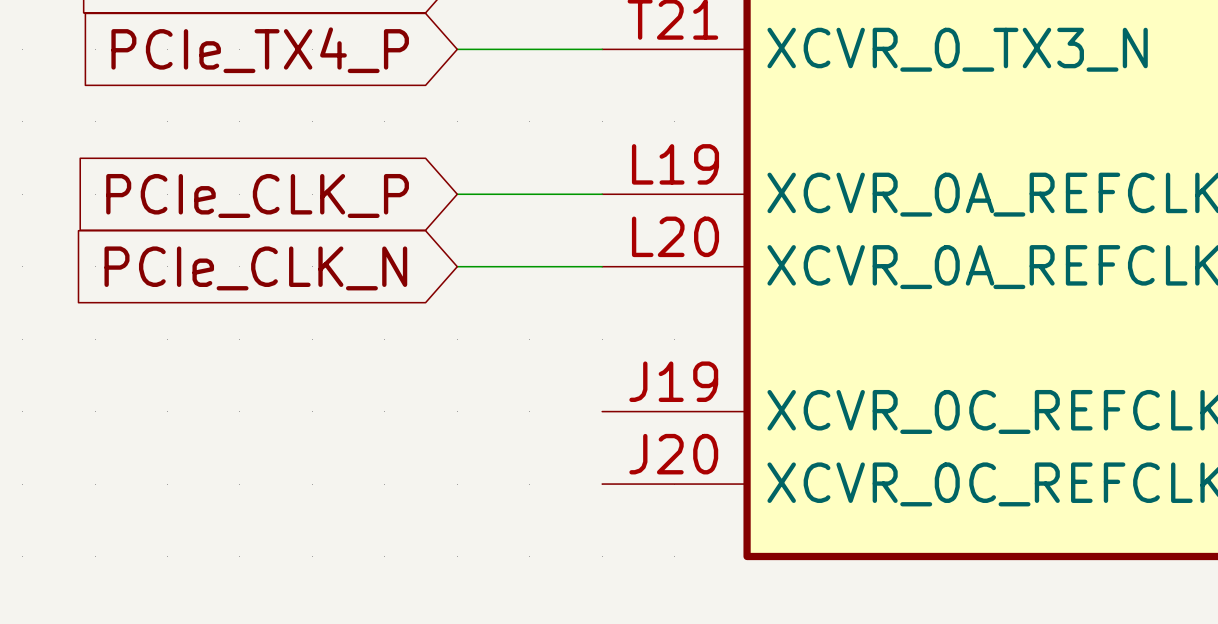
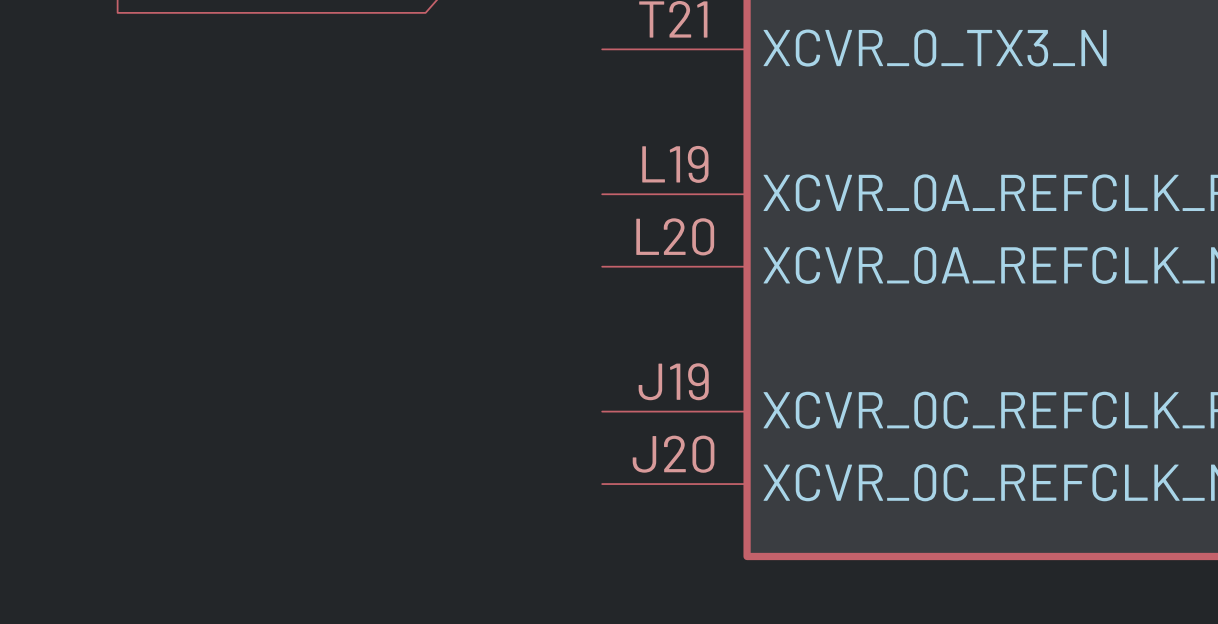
wire: (457, 49) (602, 49) -> none
global label: PCIe_TX4_P (260, 50) -> none
wire: (457, 194) (602, 194) -> none
global label: PCIe_CLK_P (257, 195) -> none
wire: (457, 266) (602, 266) -> none
global label: PCIe_CLK_N (255, 268) -> none

